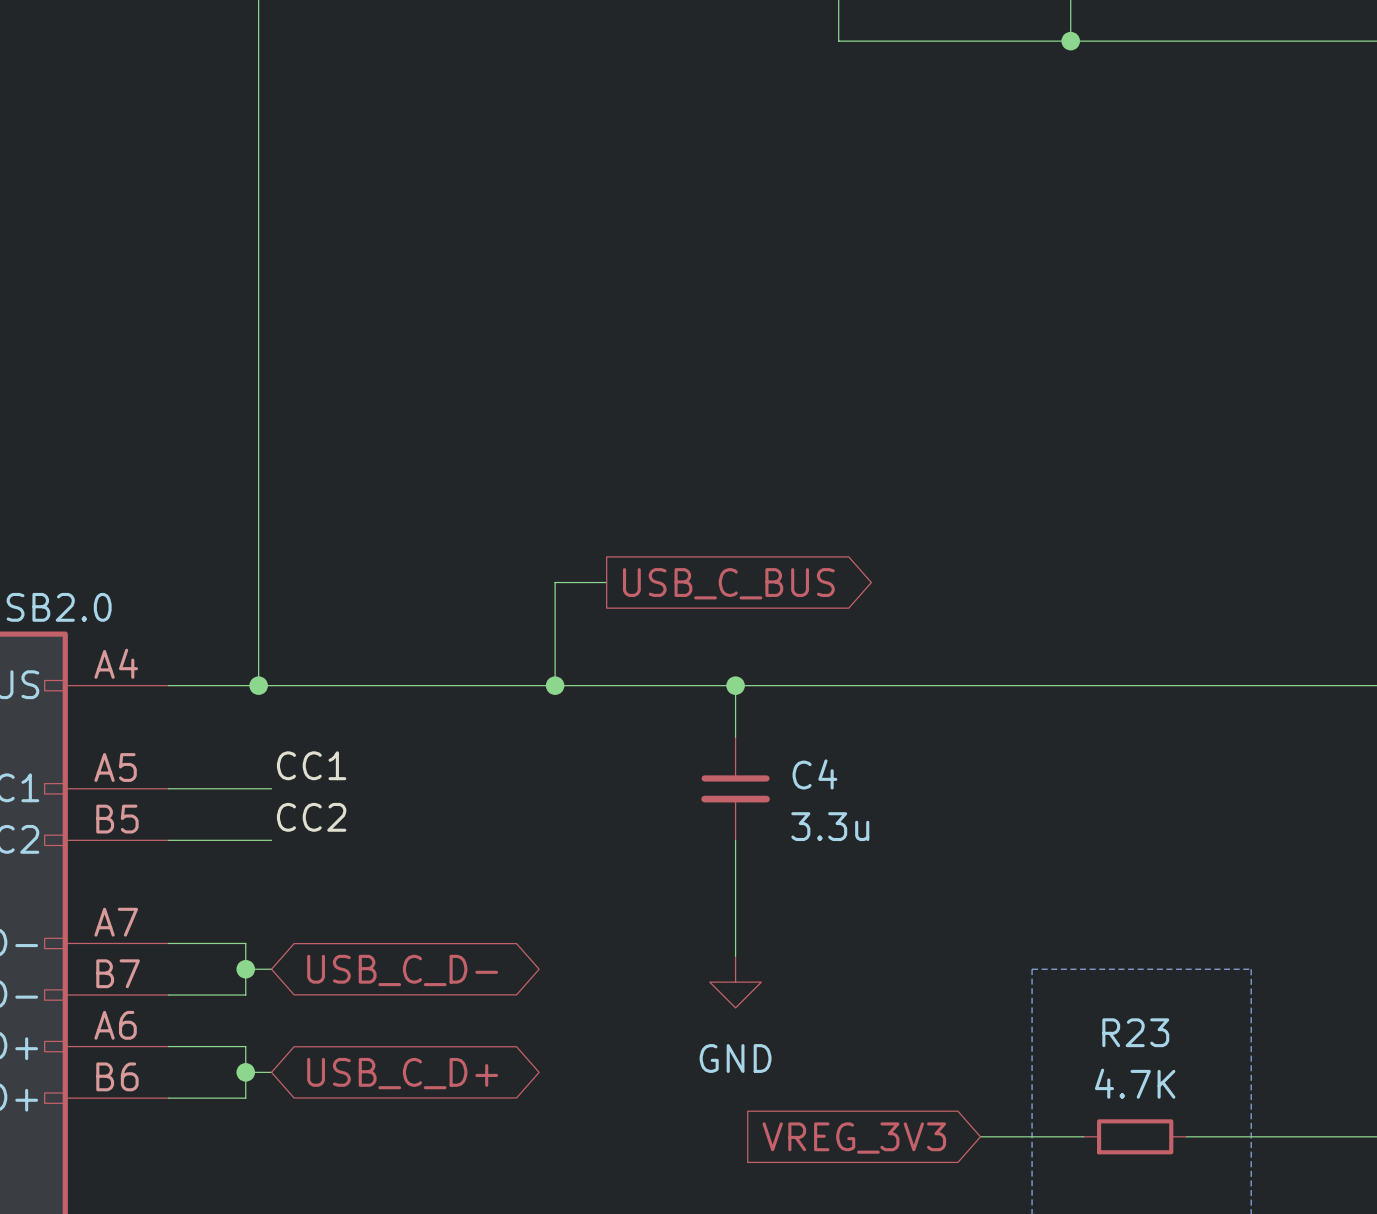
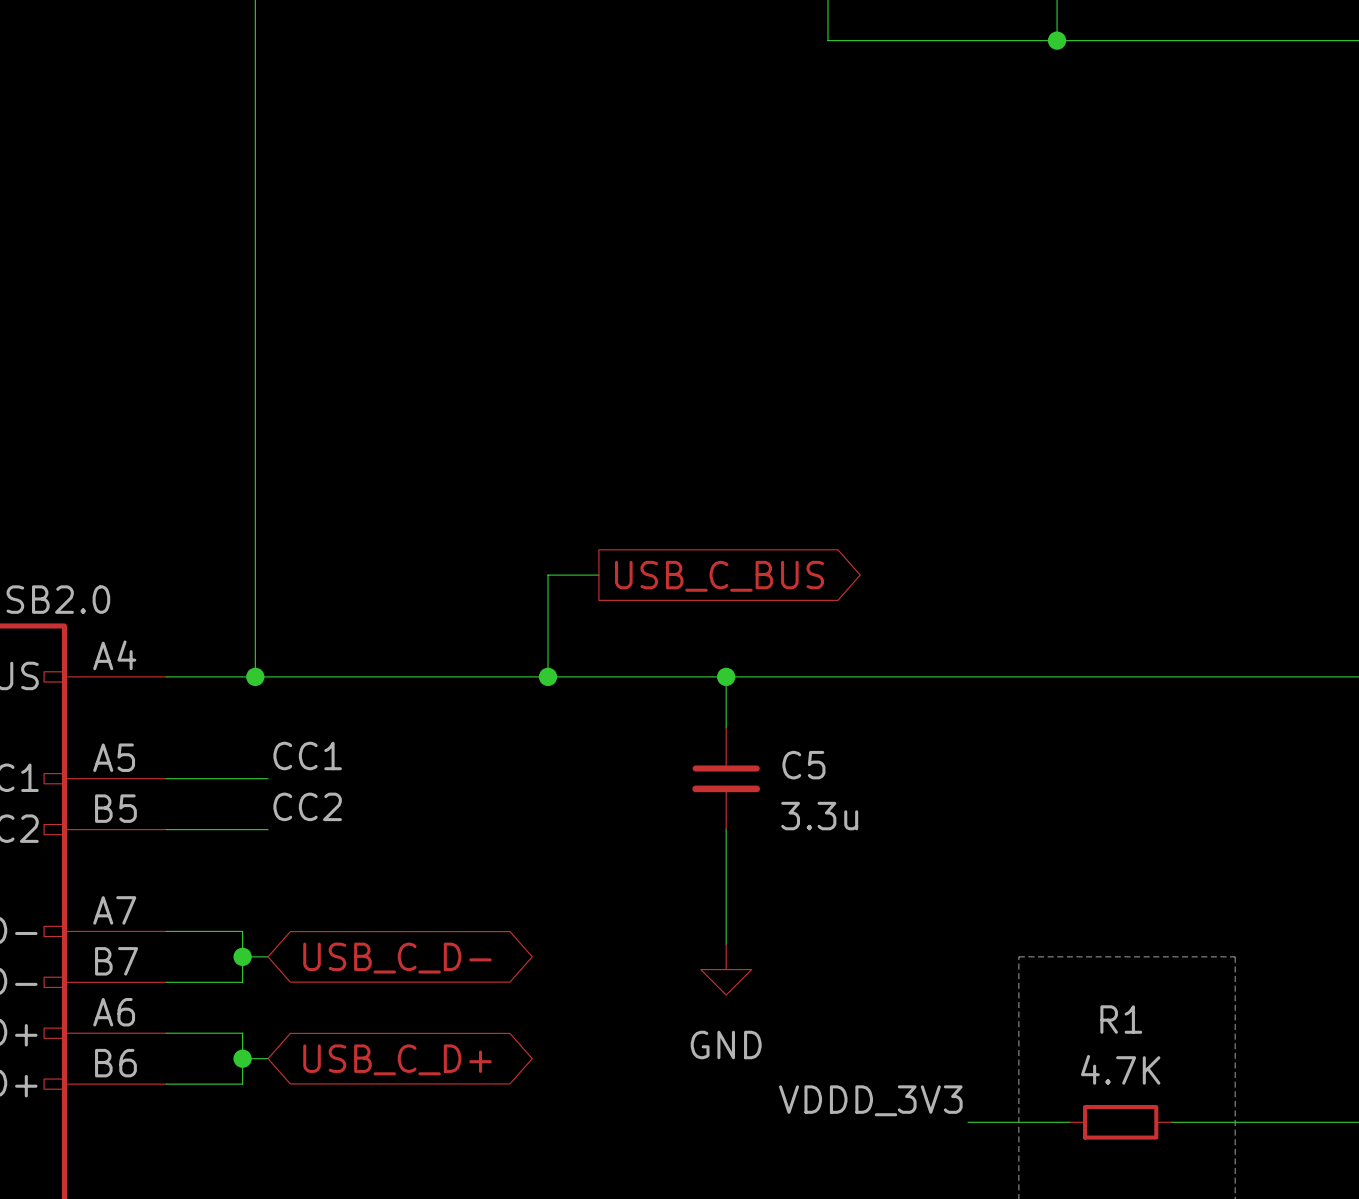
C4 name: C4 (814, 774) -> C5 (803, 765)
R23 name: R23 (1135, 1032) -> R1 (1121, 1019)
label: none -> VDDD_3V3 (870, 1100)
global label: VREG_3V3 (854, 1138) -> none

